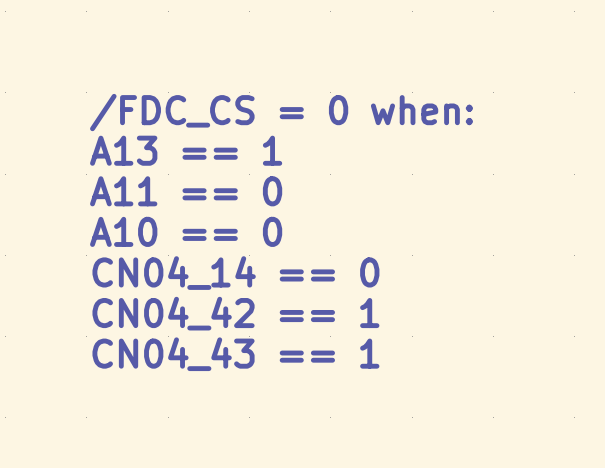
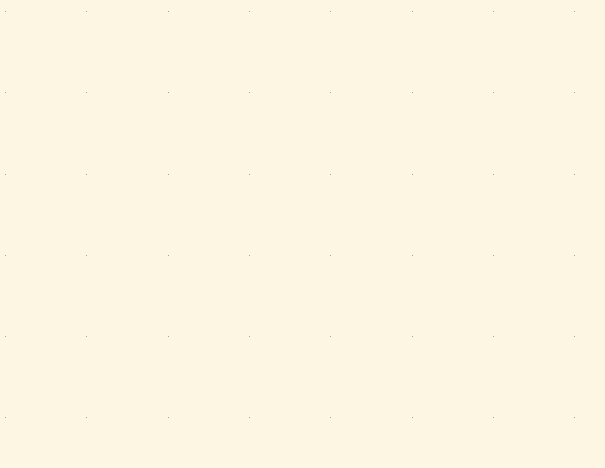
text: /FDC_CS = 0 when: (281, 112) -> none
text: A13 == 1 (186, 150) -> none
text: A11 == 0 (186, 191) -> none
text: A10 == 0 (186, 231) -> none
text: CN04_14 == 0 (235, 273) -> none
text: CN04_42 == 1 (235, 313) -> none
text: CN04_43 == 1 (235, 354) -> none

